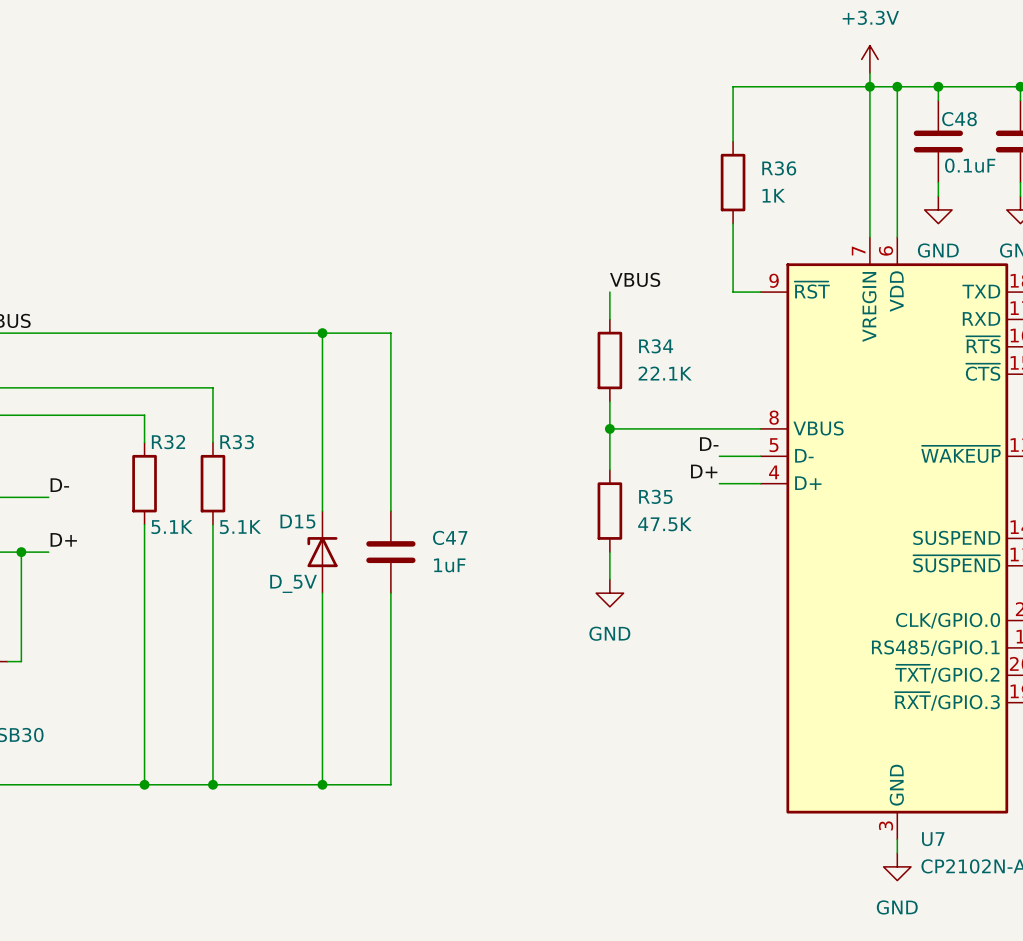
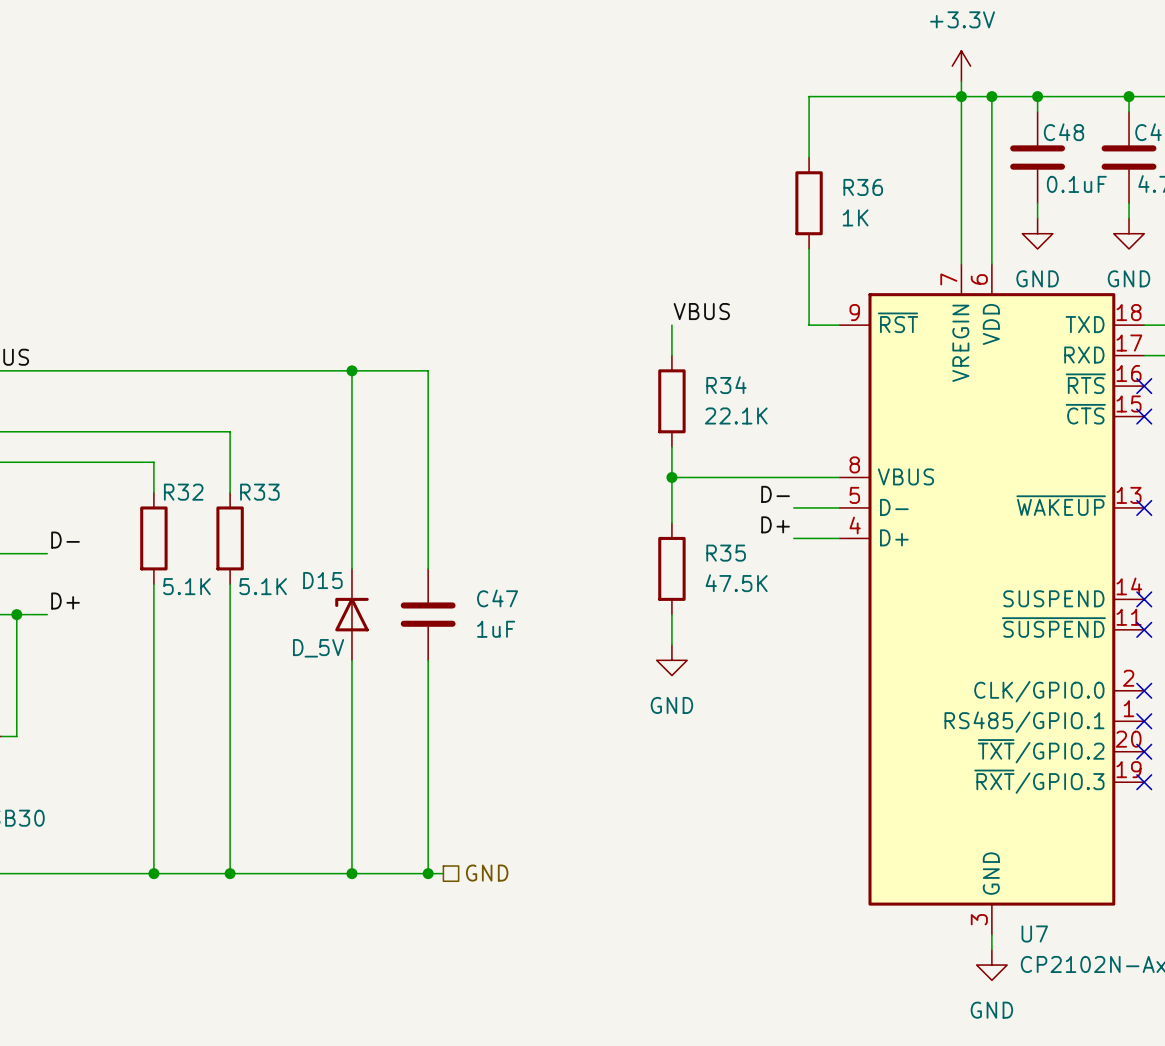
wire: none -> (428, 873) (443, 873)
junction: none -> (428, 873)
hierarchical label: none -> GND (487, 873)

